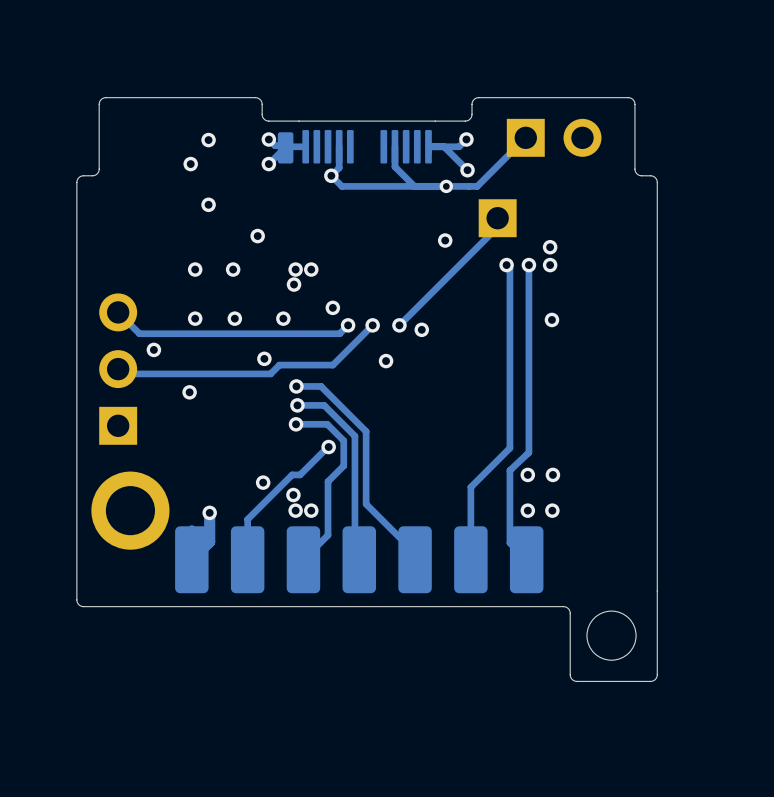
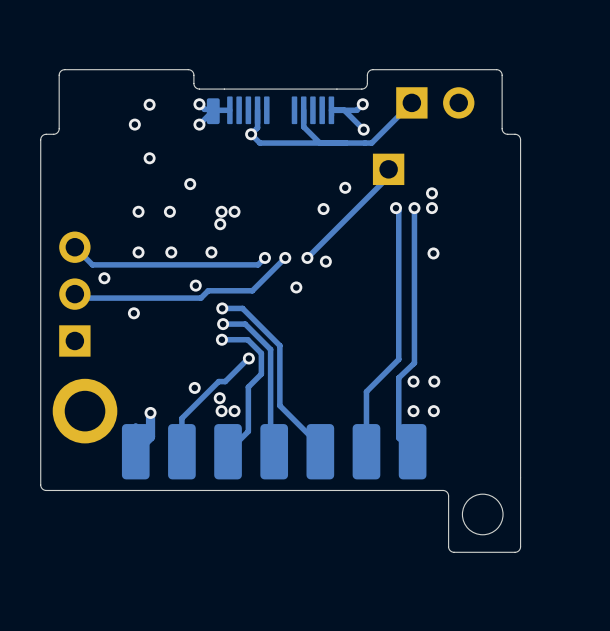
via: (446, 186) -> none
via position: (332, 307) -> (323, 209)

